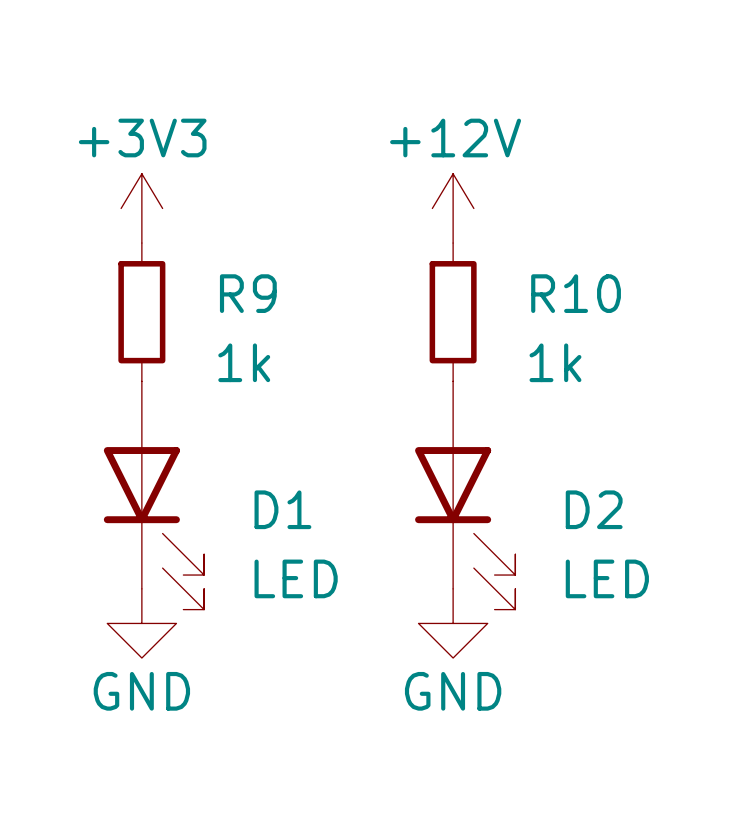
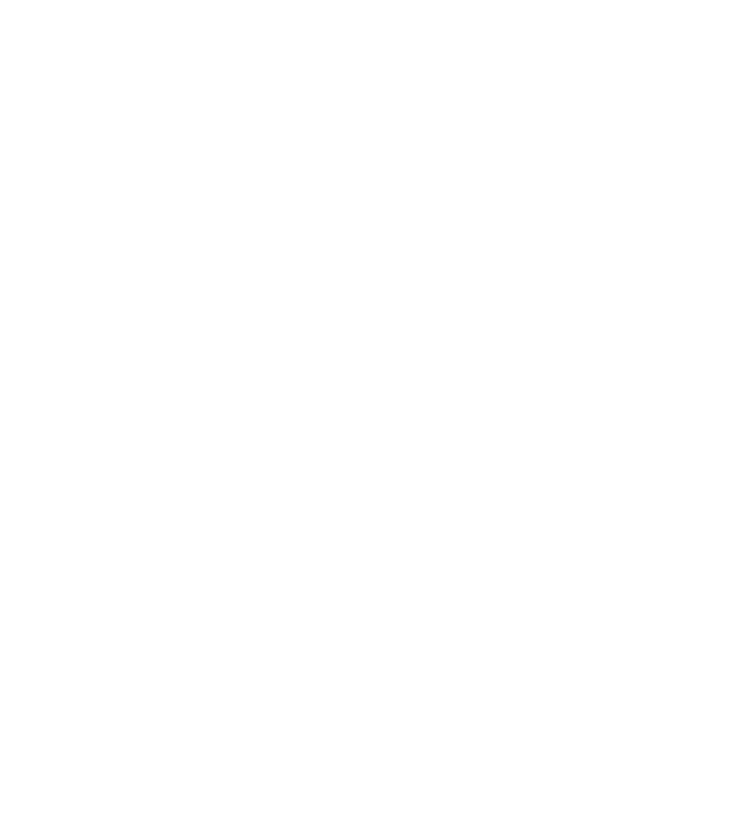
power symbol: +3V3 (141, 208) -> none
power symbol: +12V (453, 208) -> none
R9: 1k (141, 312) -> none
R10: 1k (453, 312) -> none
D1: LED (153, 495) -> none
D2: LED (465, 495) -> none
power symbol: GND (141, 623) -> none
power symbol: GND (453, 623) -> none

